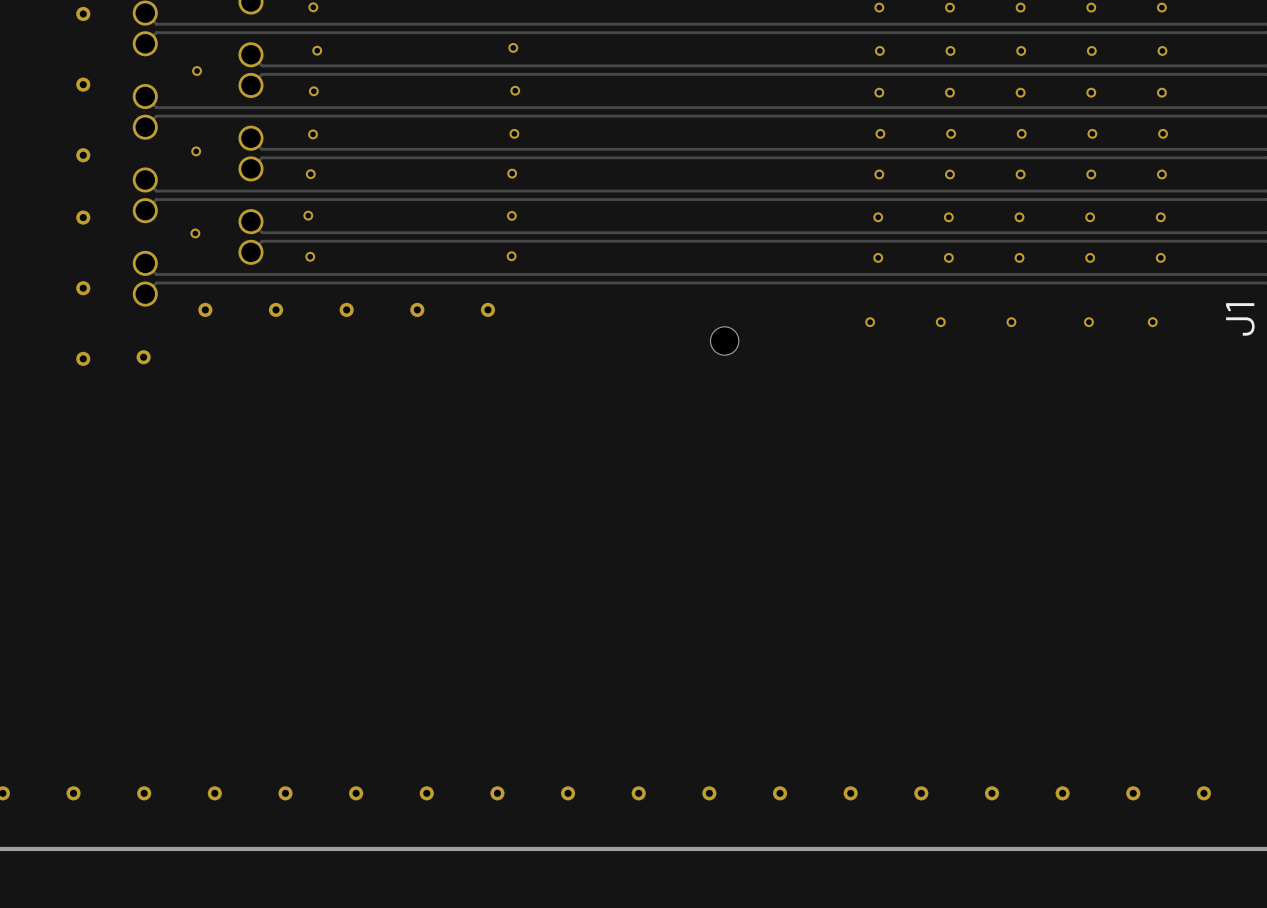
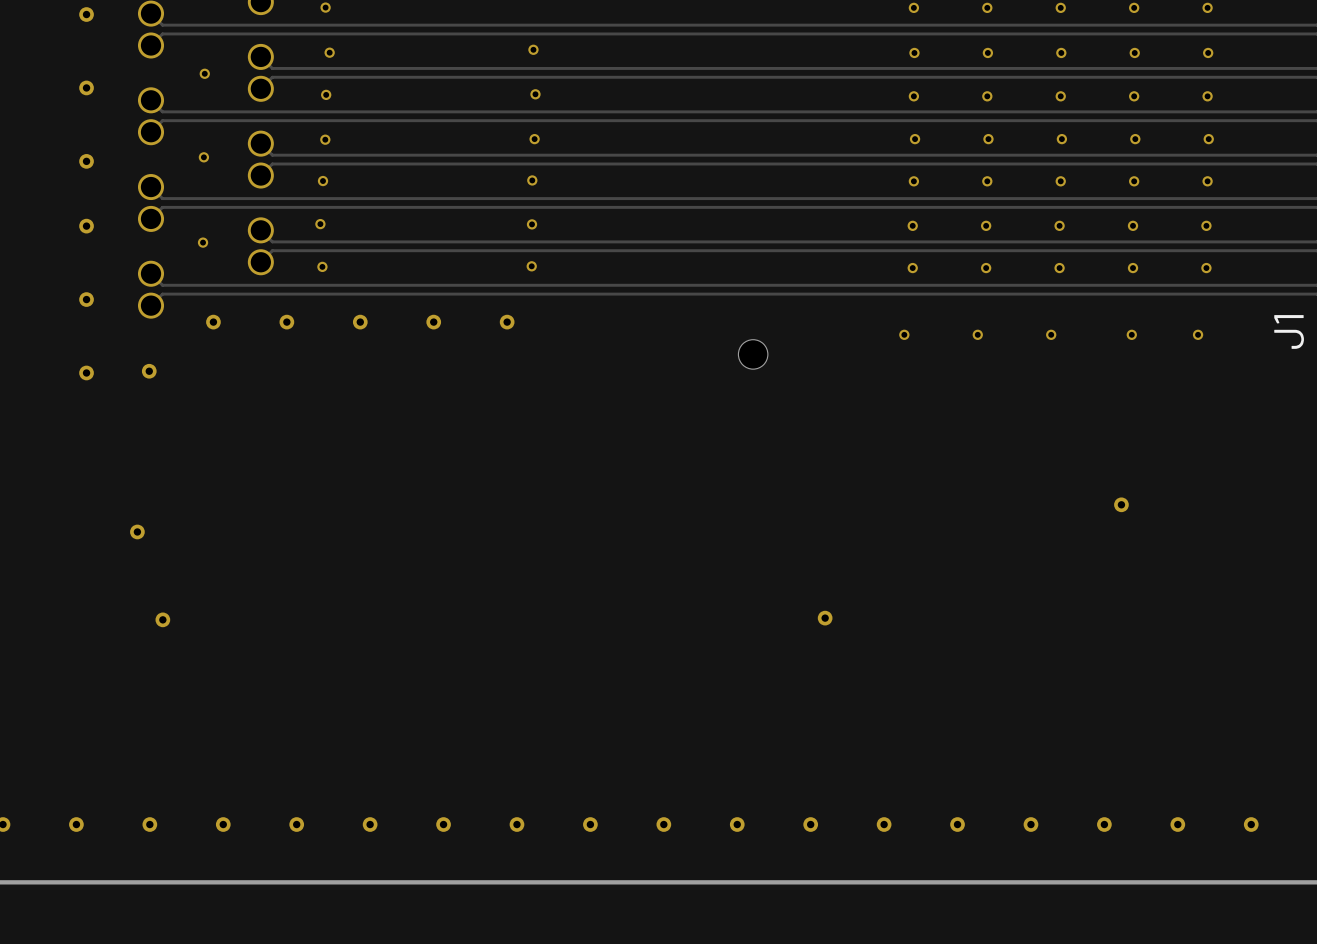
via: none -> (1121, 504)
via: none -> (137, 531)
via: none -> (825, 618)
via: none -> (162, 619)

